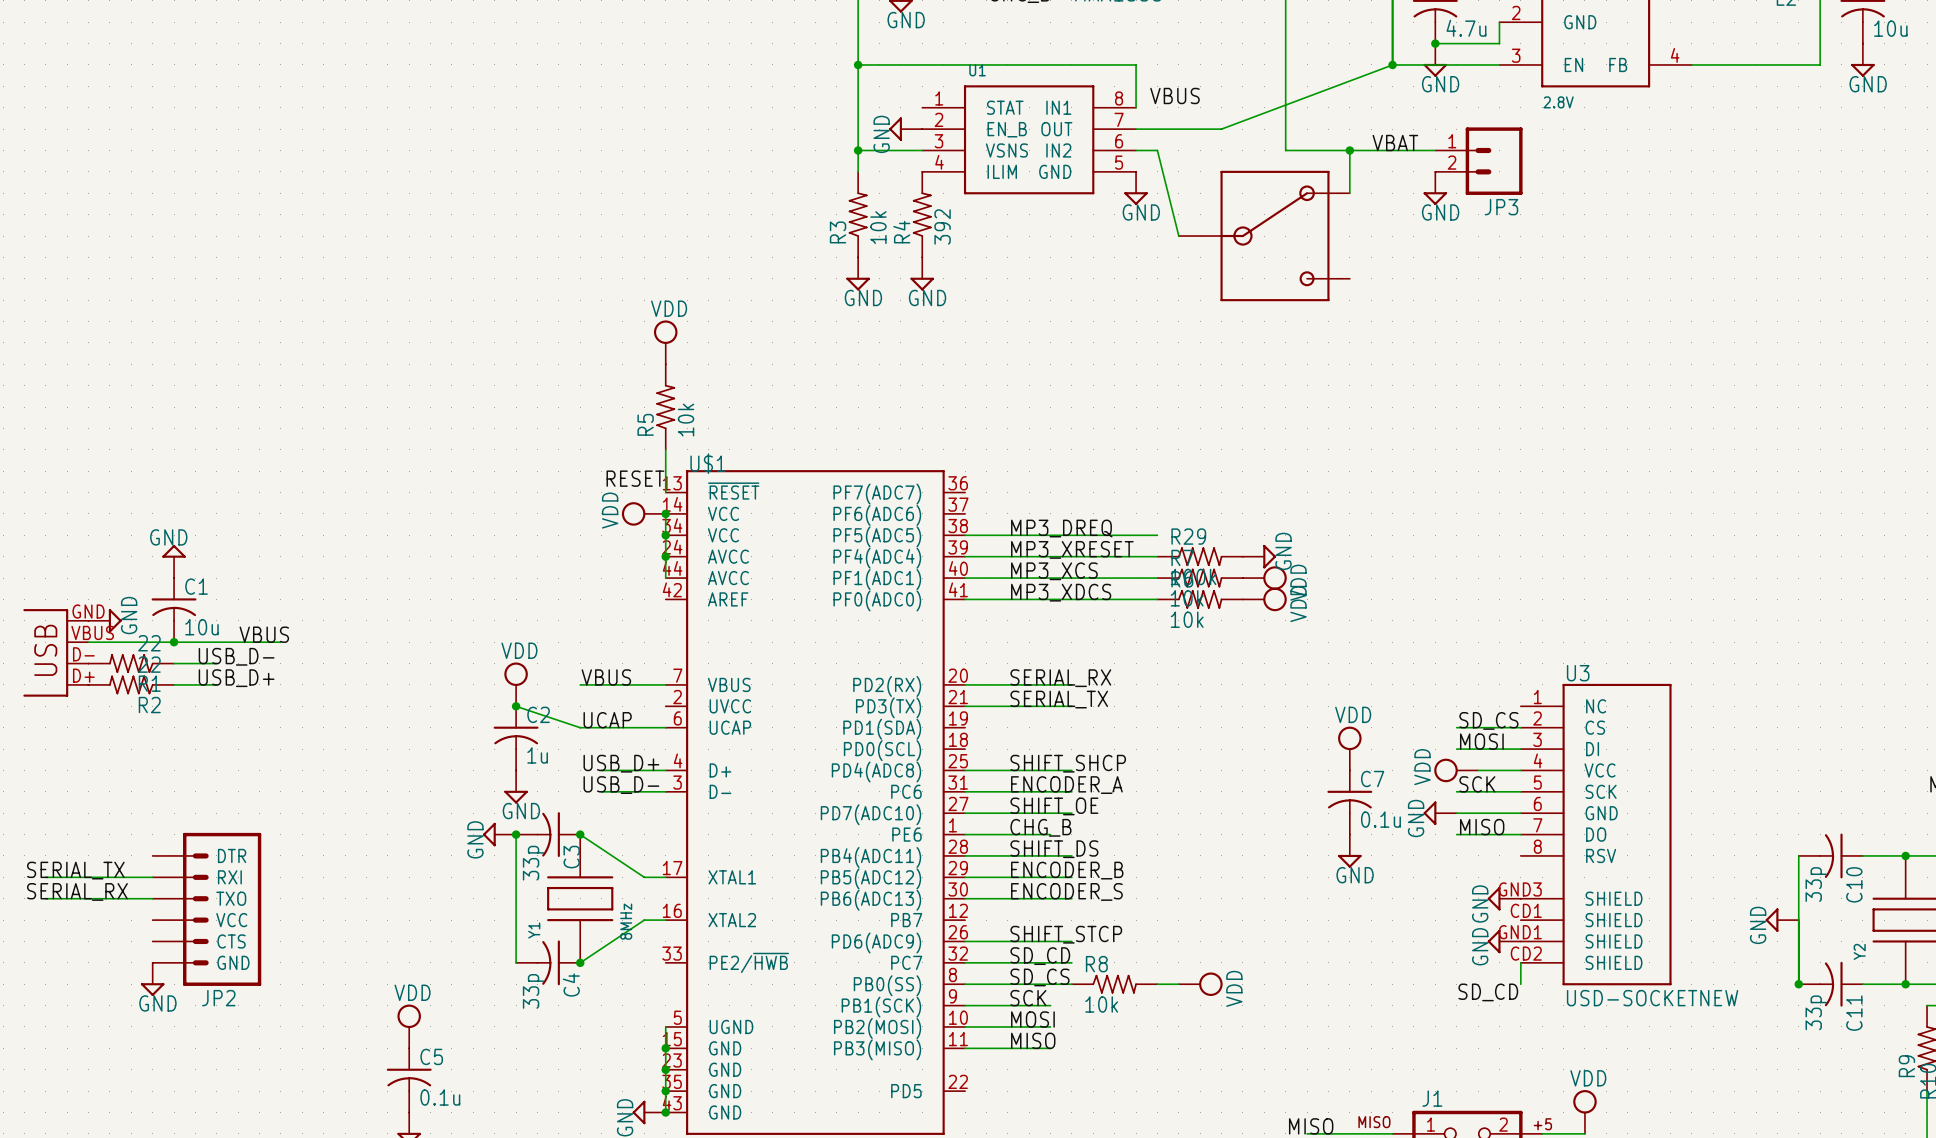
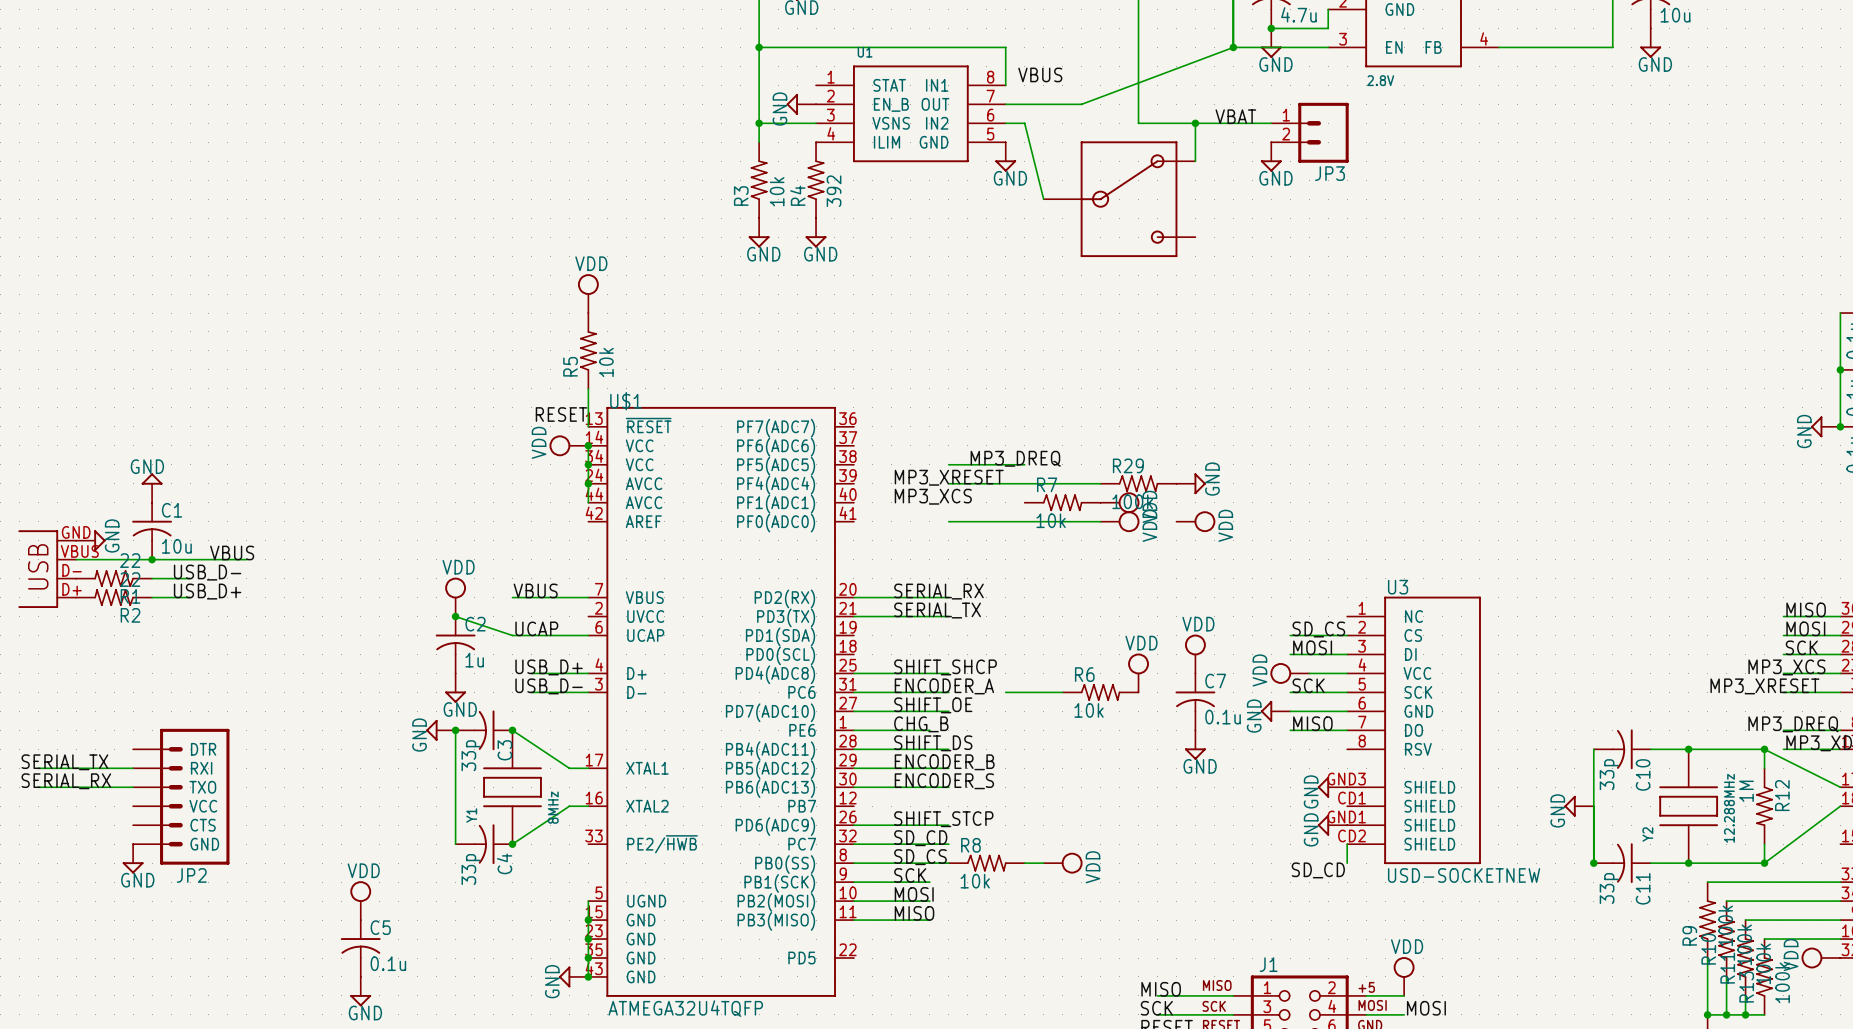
label position: MP3_DREQ (1061, 528) -> MP3_DREQ (1015, 458)
wire: (965, 535) (1071, 535) -> none
wire: (965, 556) (1071, 556) -> none
R29 position: (1200, 556) -> (1138, 483)
power symbol position: GND (1259, 556) -> GND (1191, 483)
wire: (965, 578) (1157, 578) -> none
label: MP3_XDCS (1061, 592) -> none
wire: (965, 599) (1071, 599) -> none
R6 position: (1200, 599) -> (1100, 692)
power symbol: none -> VDD (1195, 521)
power symbol: none -> VDD (1138, 672)
wire: none -> (1005, 692) (1062, 692)

